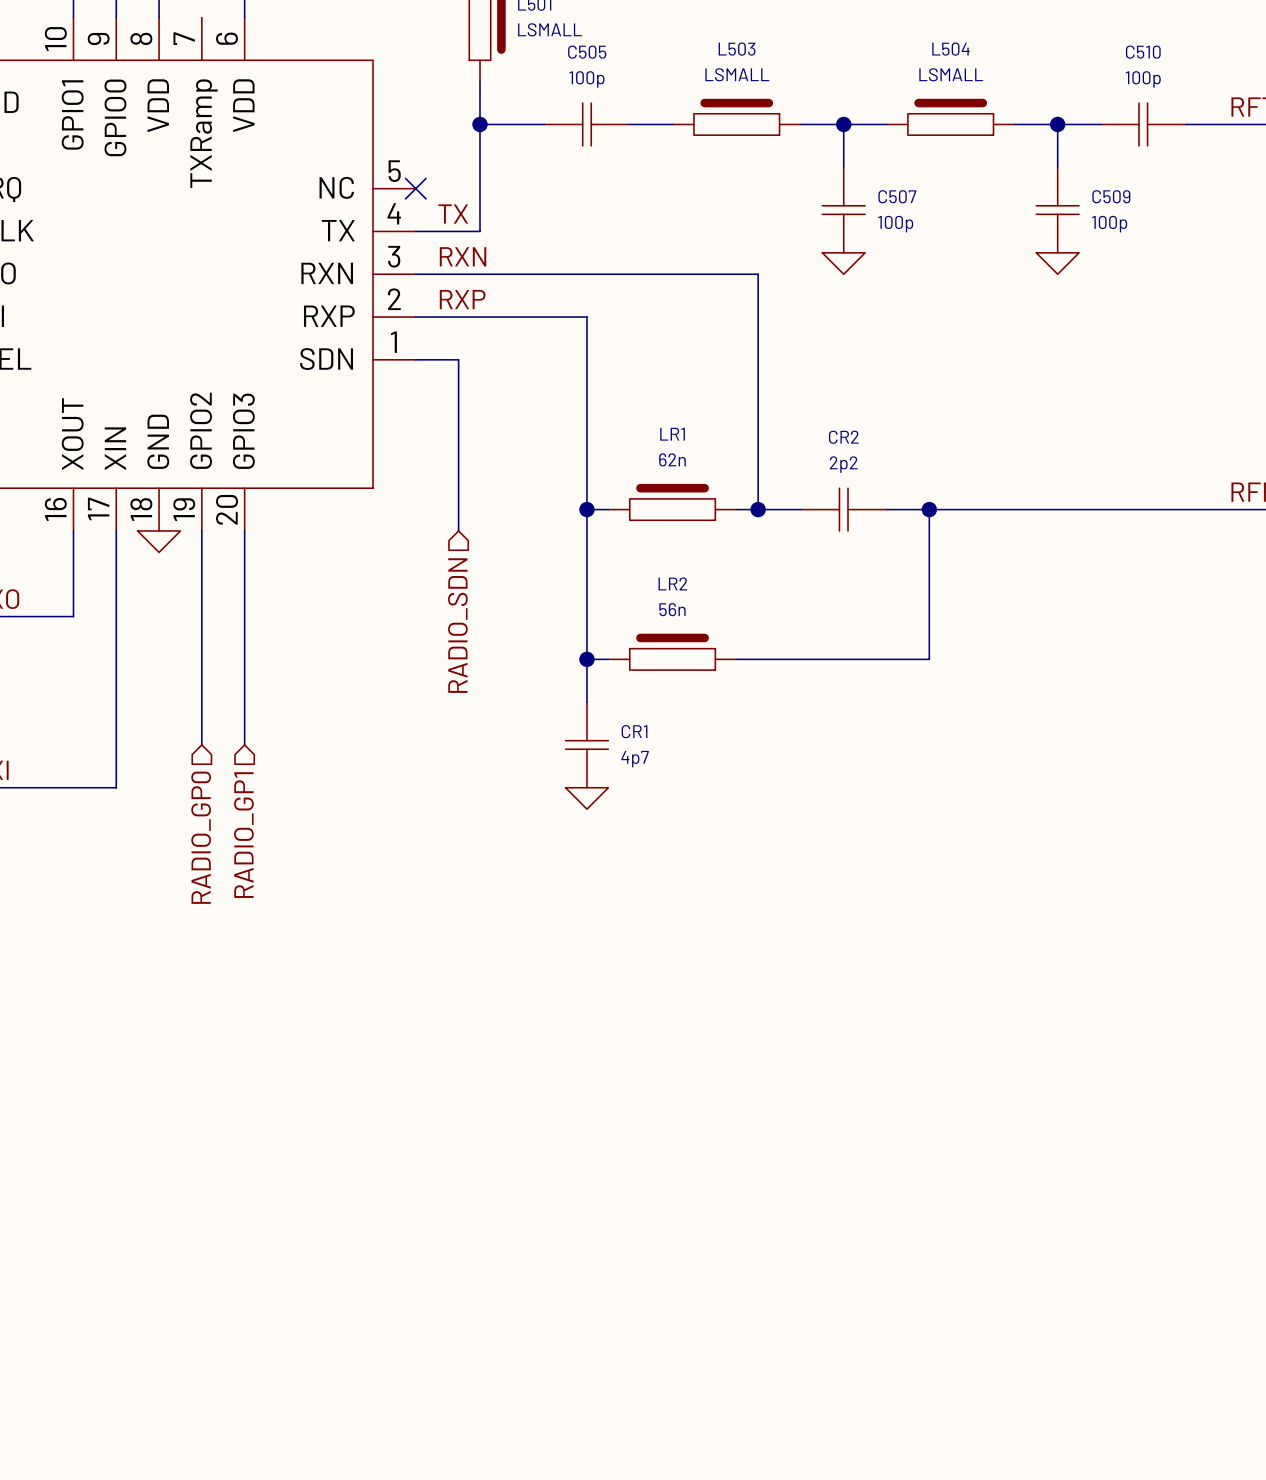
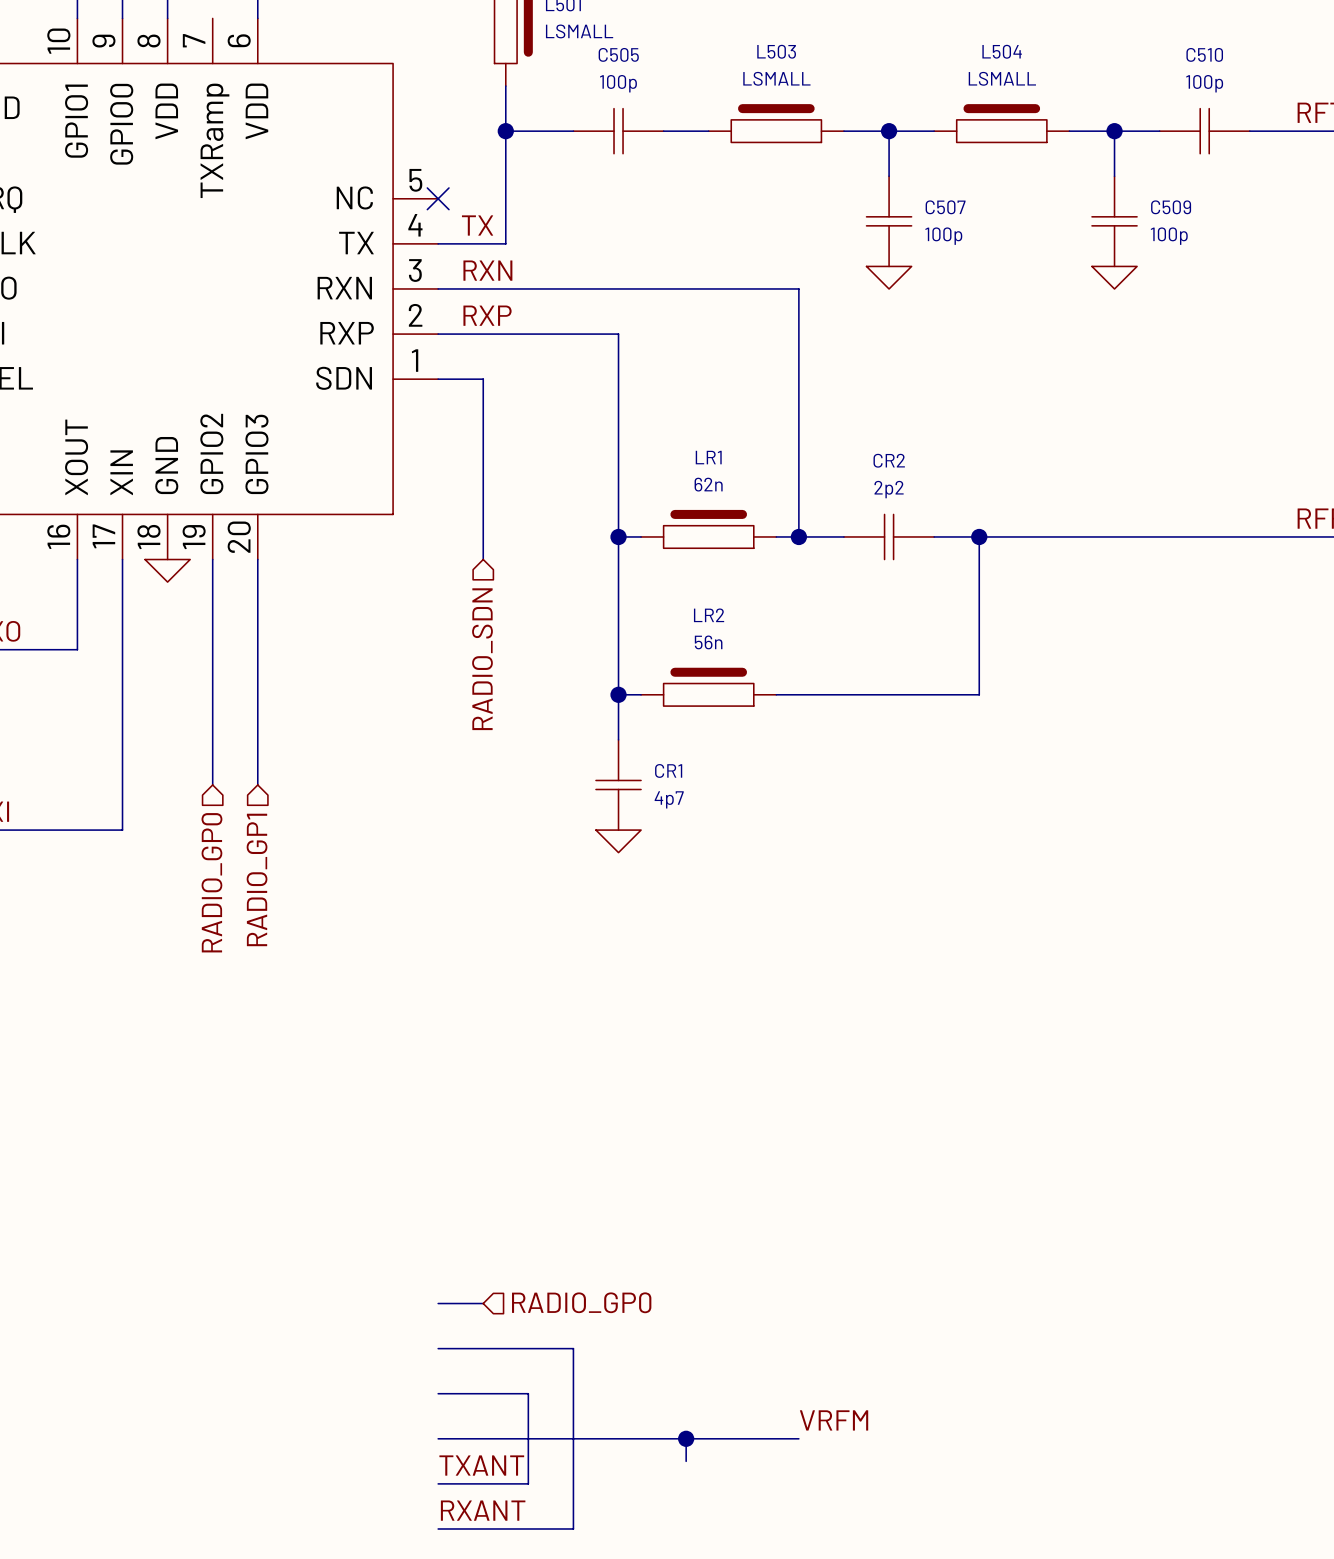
hierarchical label: none -> RADIO_GP0 (581, 1302)
wire: none -> (438, 1303) (483, 1303)
wire: none -> (438, 1348) (573, 1348) (573, 1528) (438, 1528)
wire: none -> (438, 1393) (528, 1393) (528, 1483) (438, 1483)
label: none -> VRFM (834, 1420)
wire: none -> (438, 1438) (798, 1438)
wire: none -> (686, 1438) (686, 1461)
junction: none -> (686, 1438)
label: none -> TXANT (481, 1465)
label: none -> RXANT (483, 1510)

